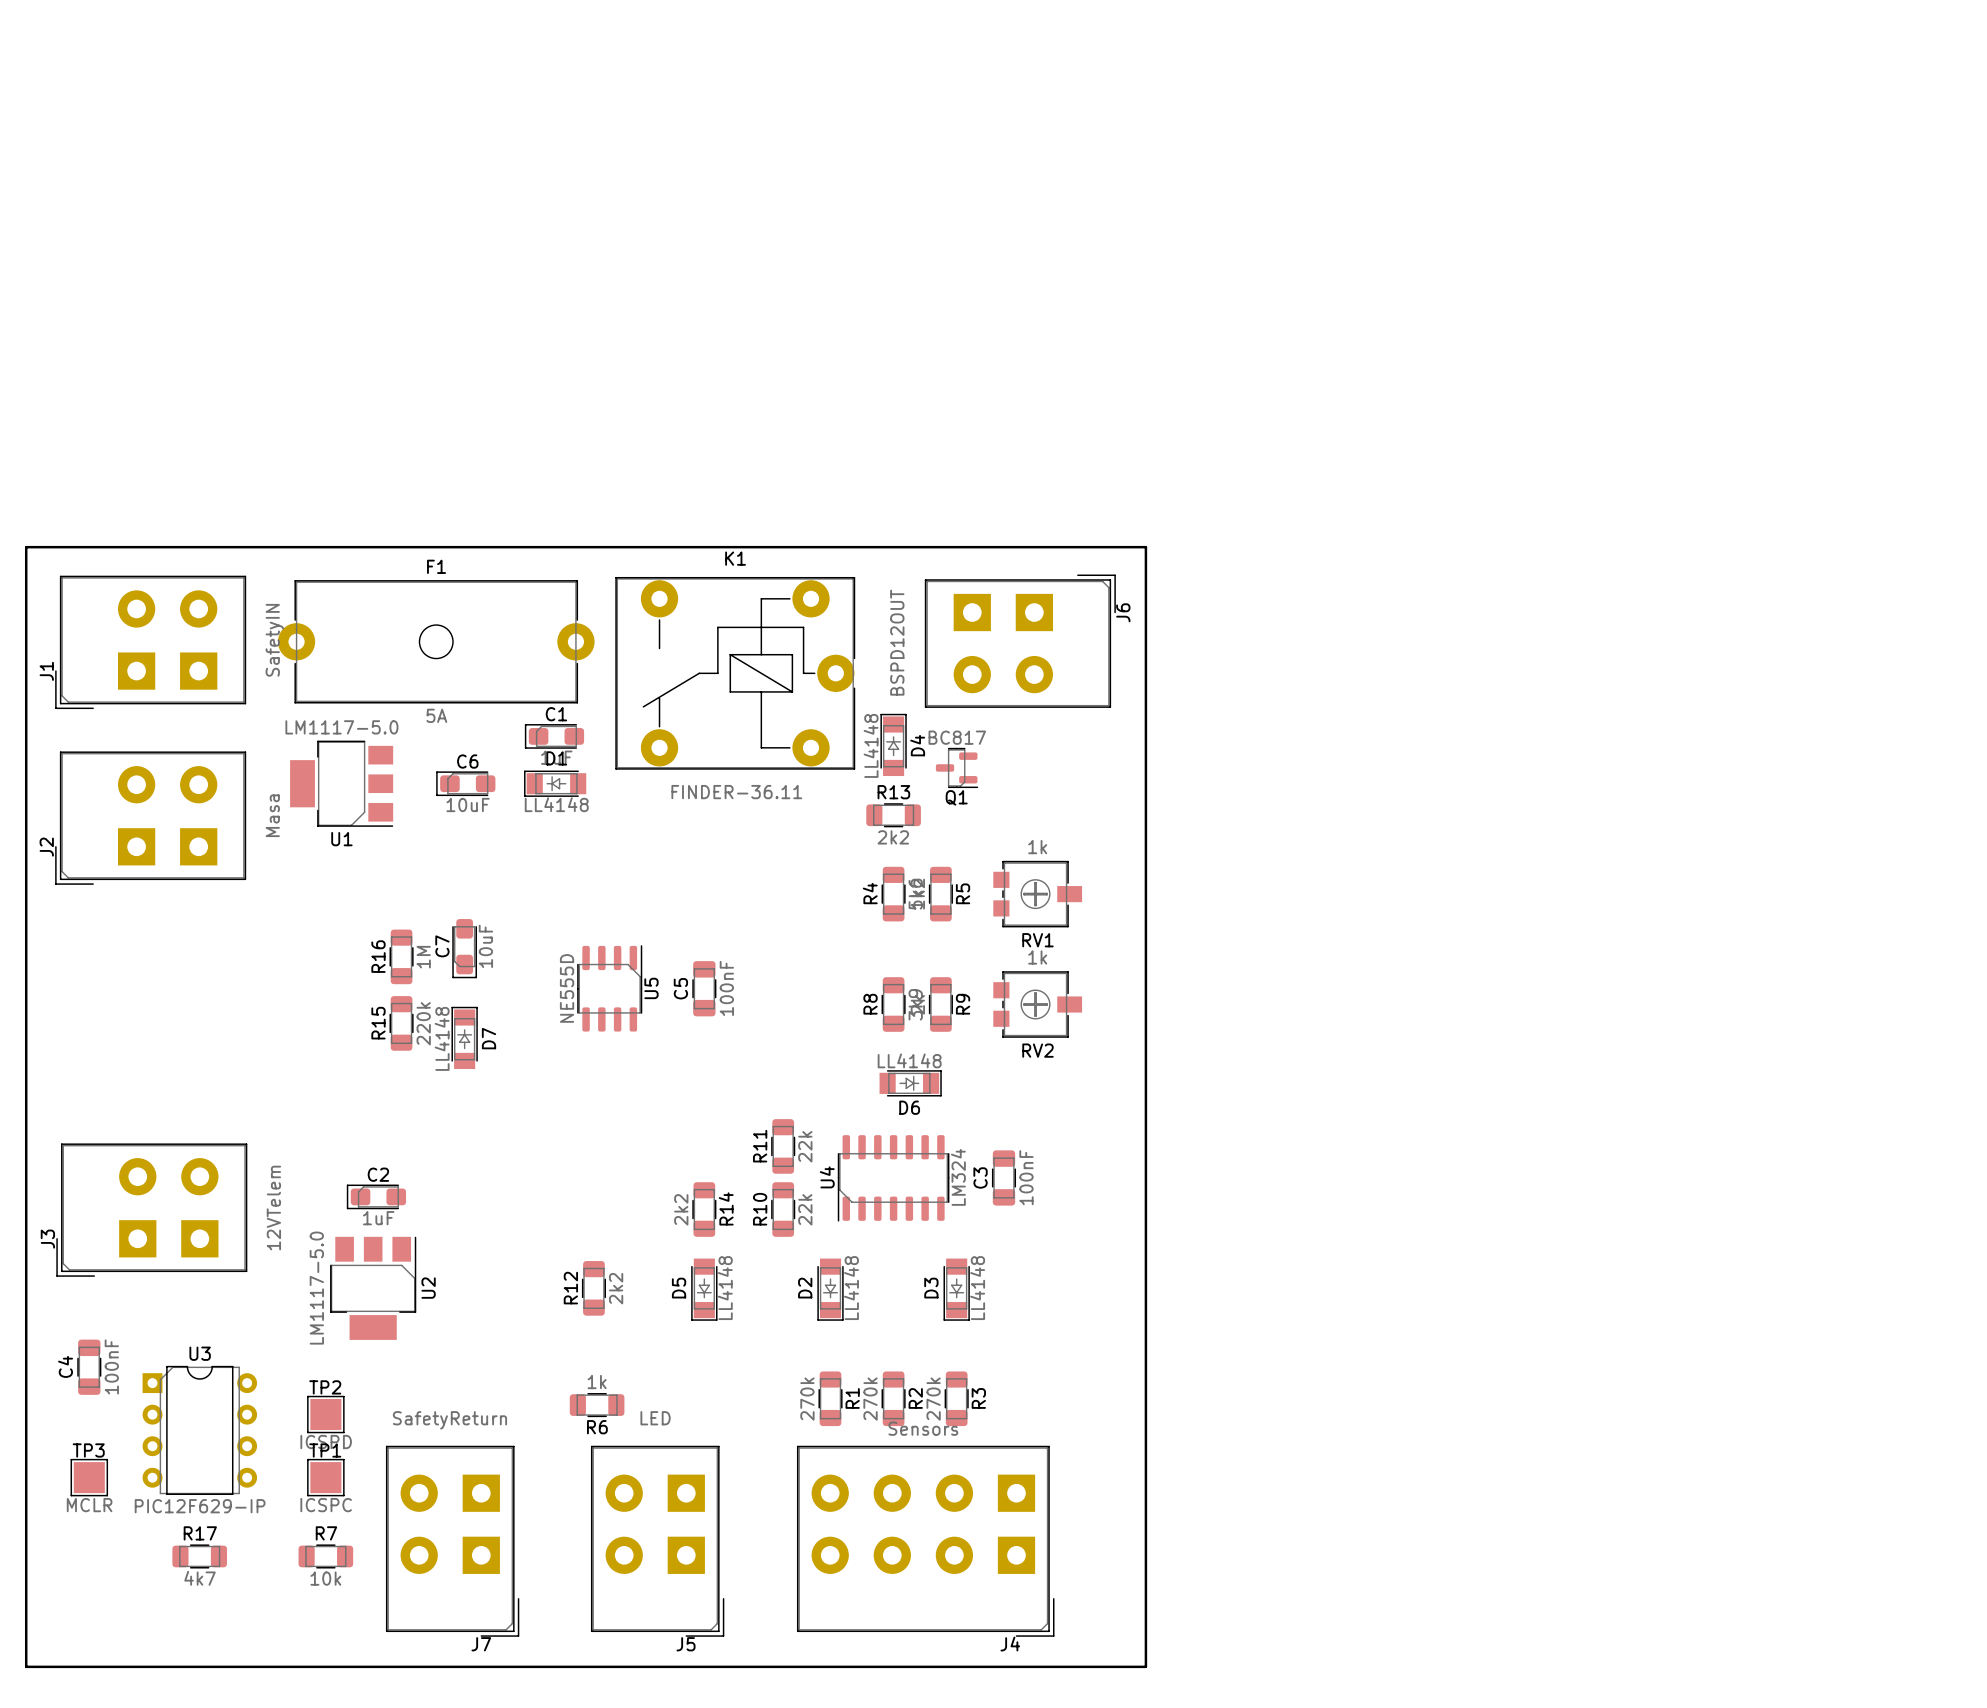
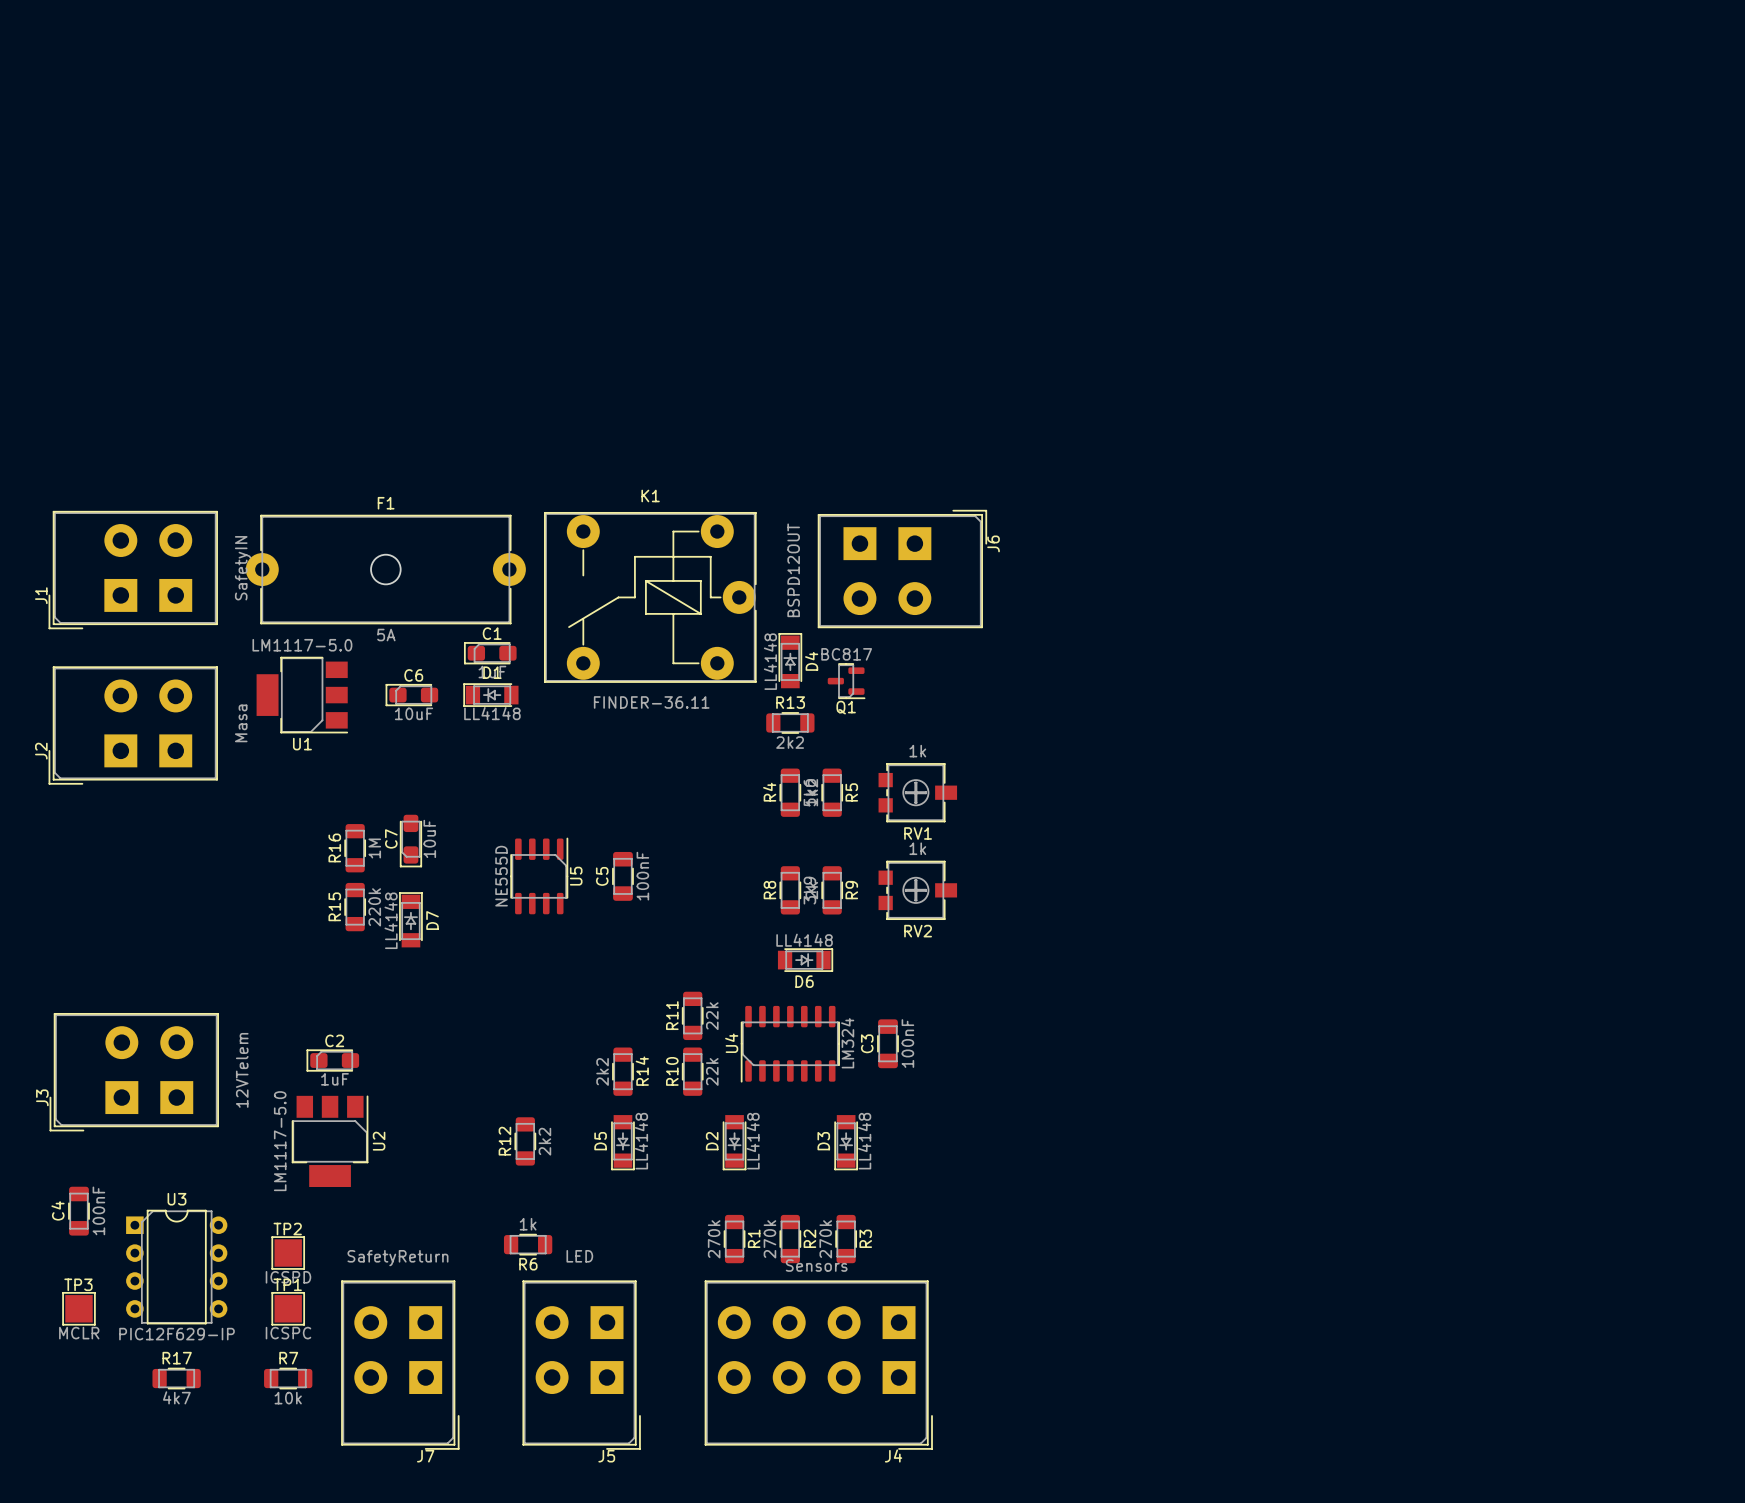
board edge: (26, 547) (1145, 547) (1145, 1666) (26, 1666) (26, 547) -> none

